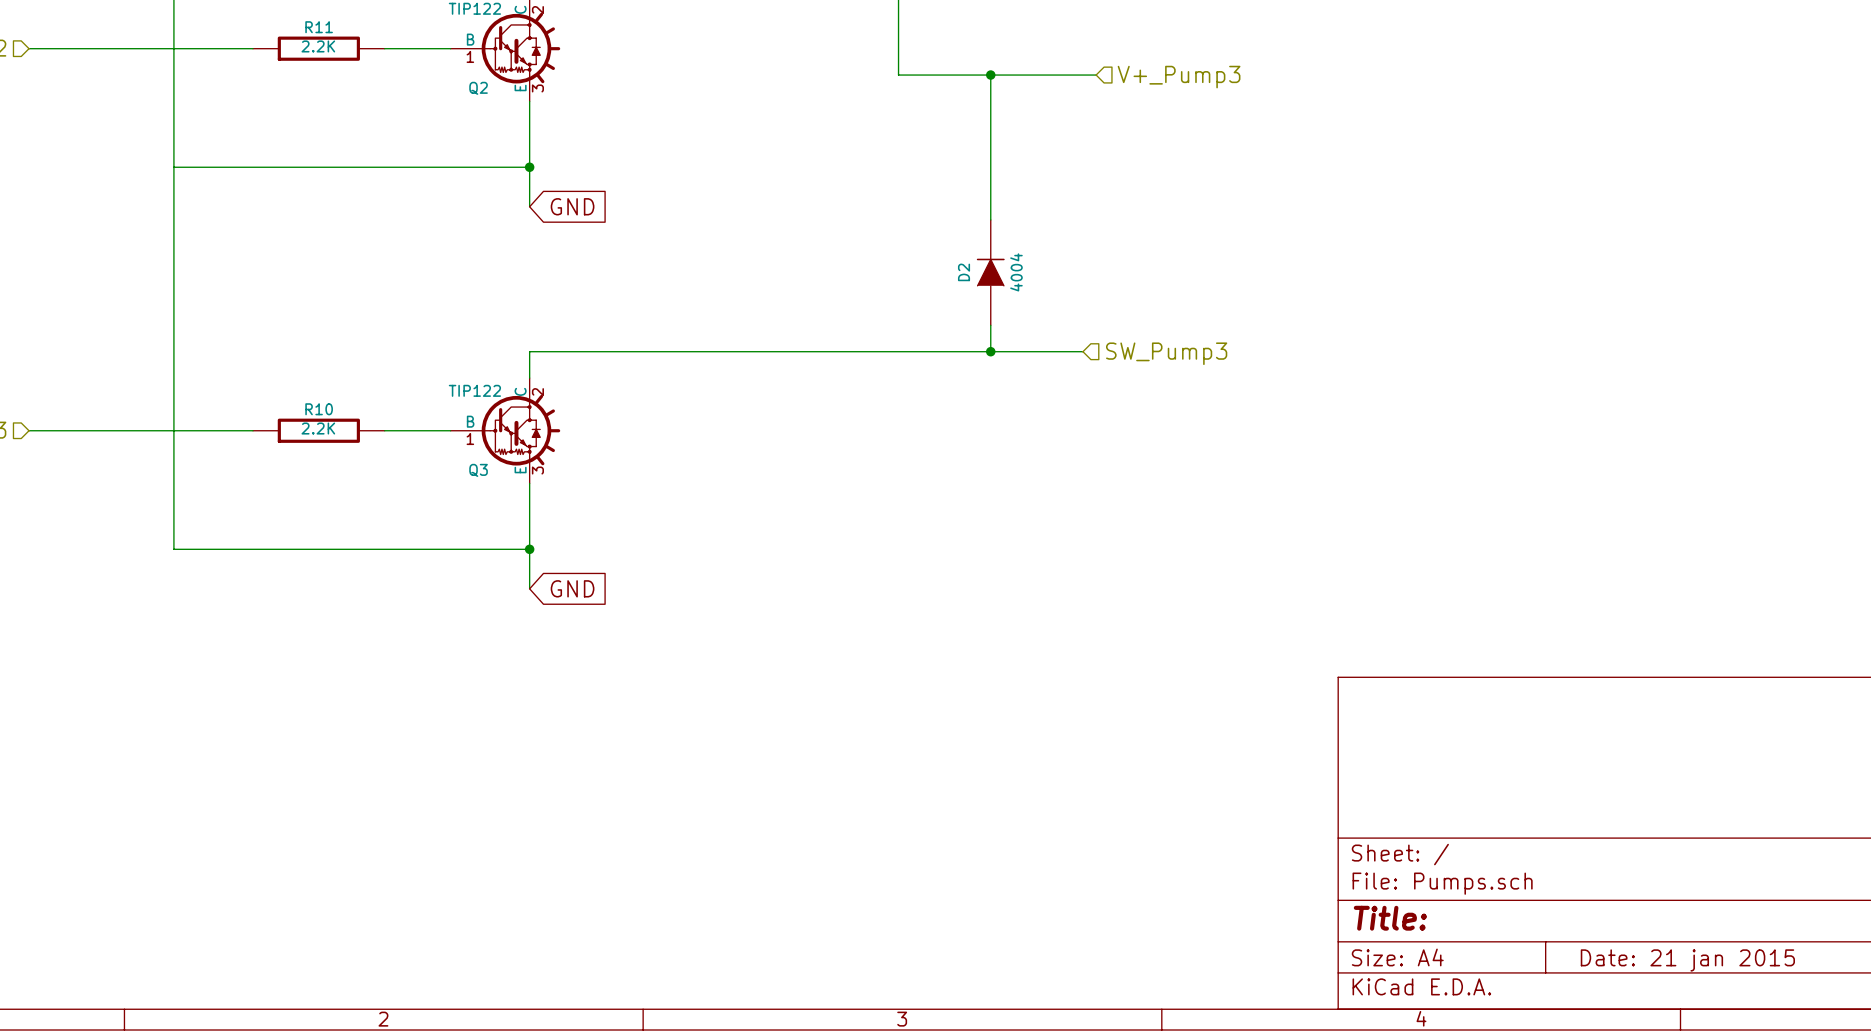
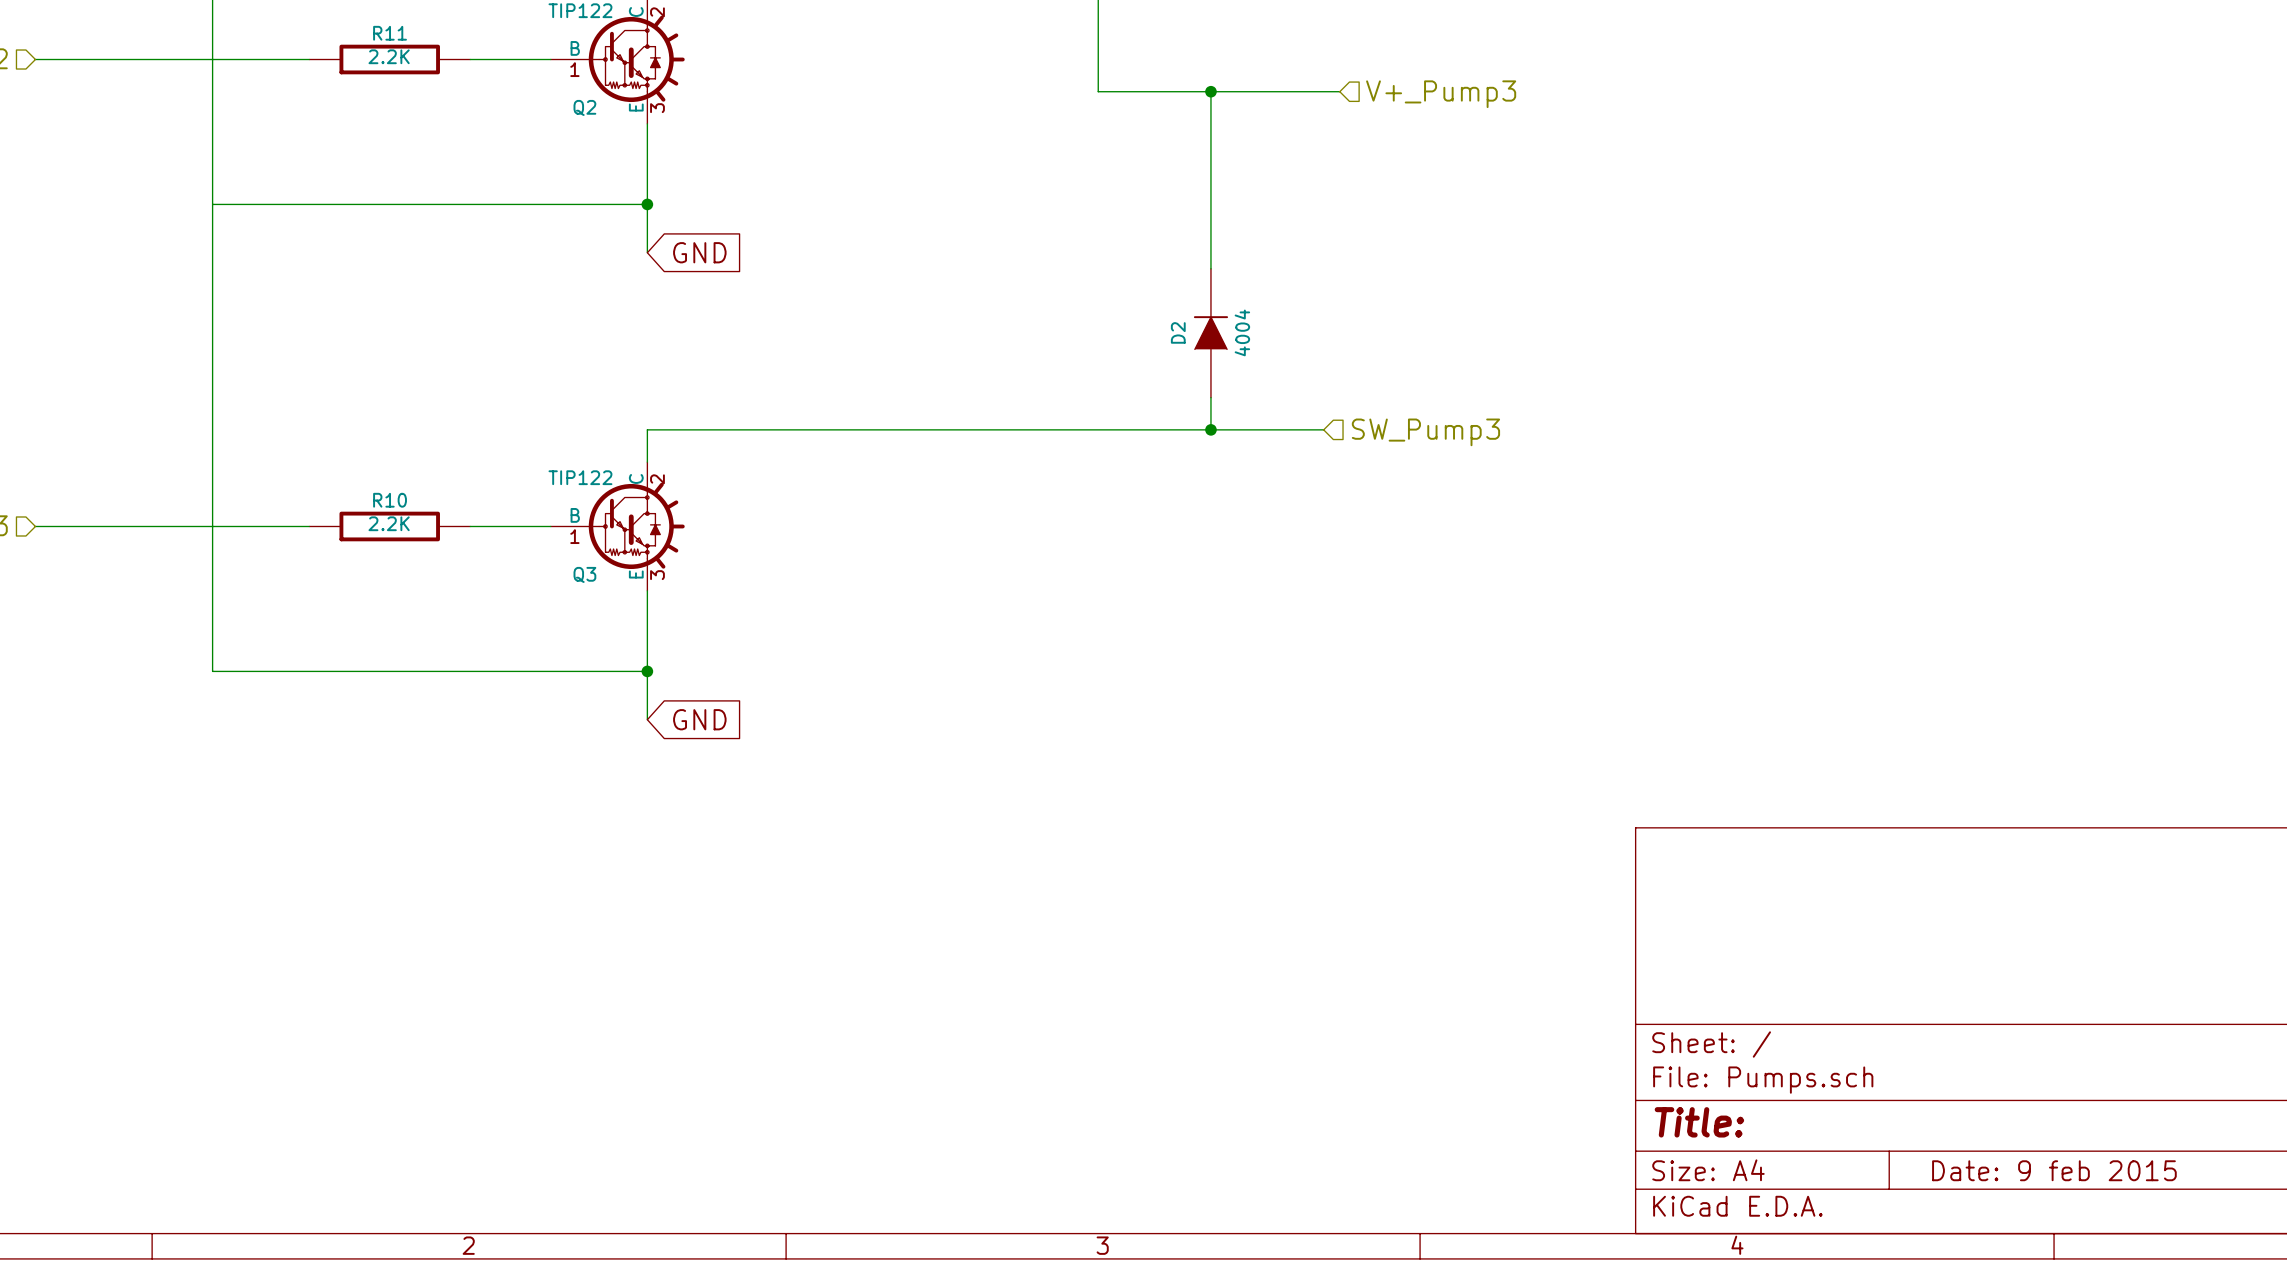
title block: Date: 21 jan 2015 (1687, 960) -> Date: 9 feb 2015 (2054, 1170)

